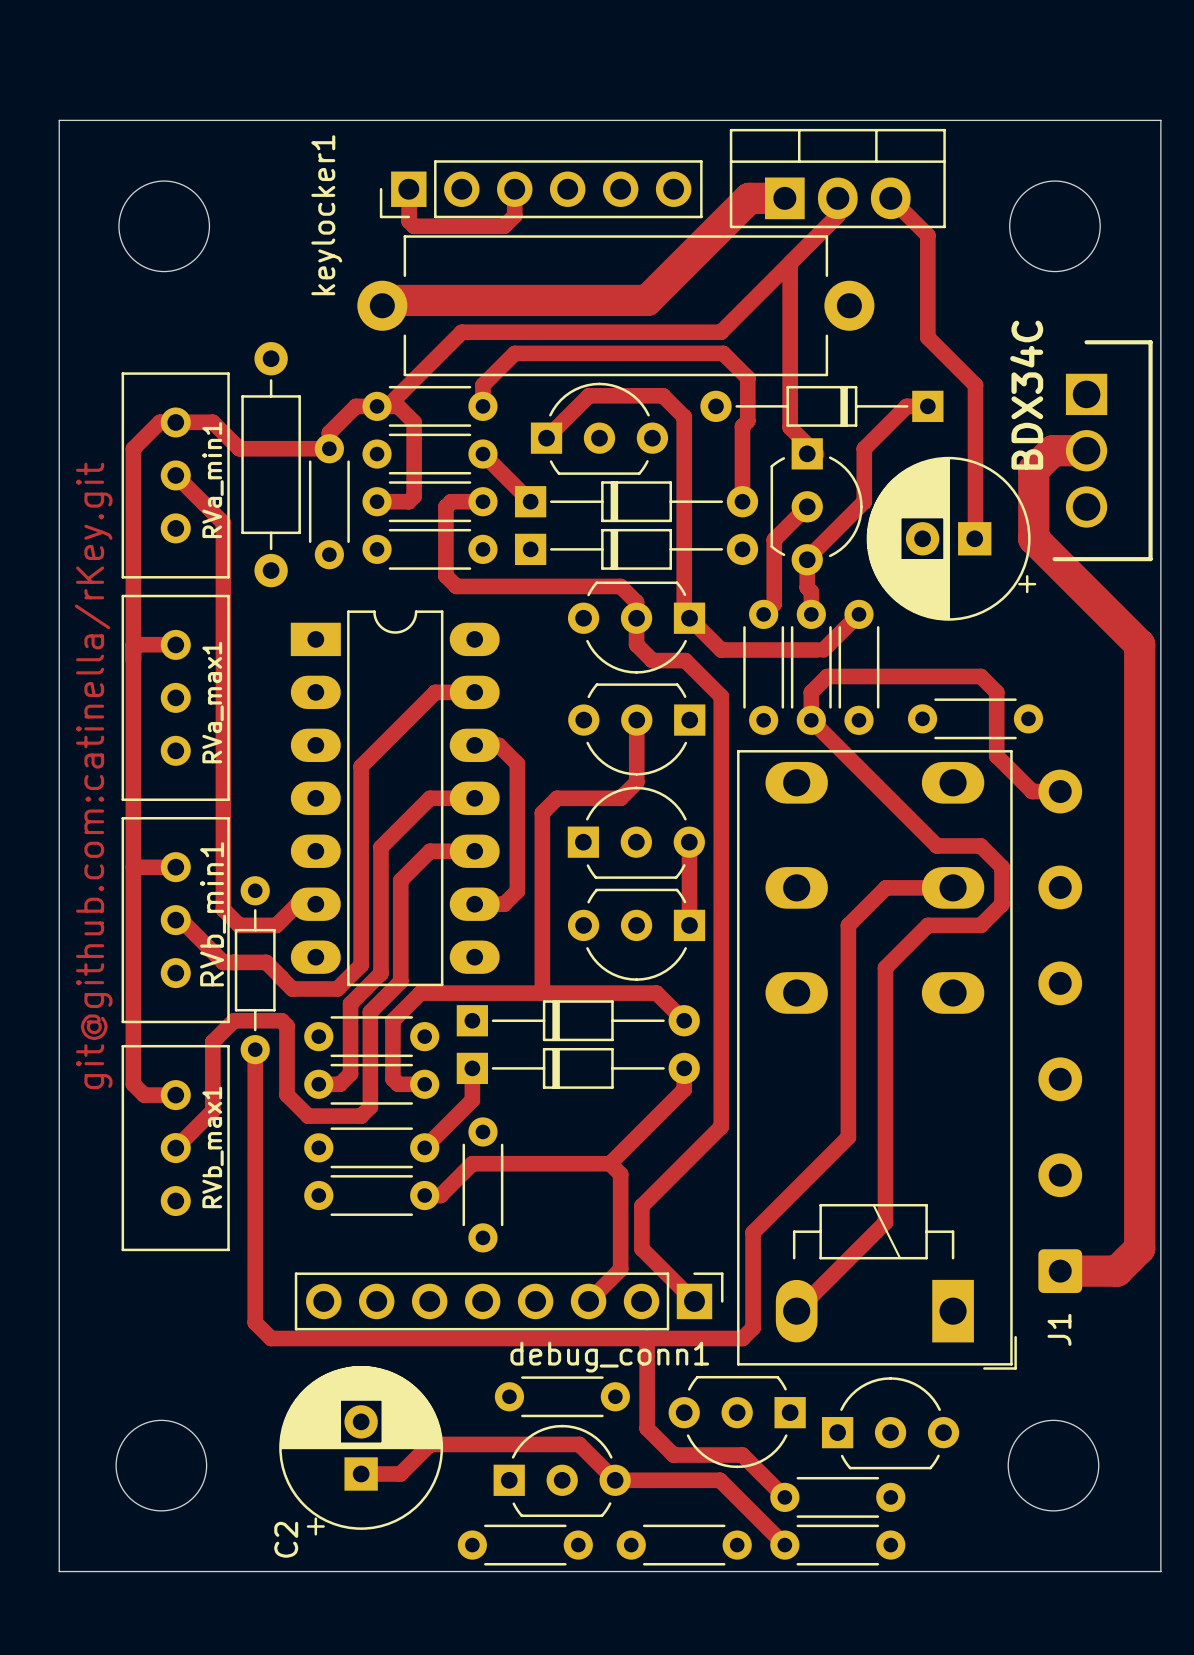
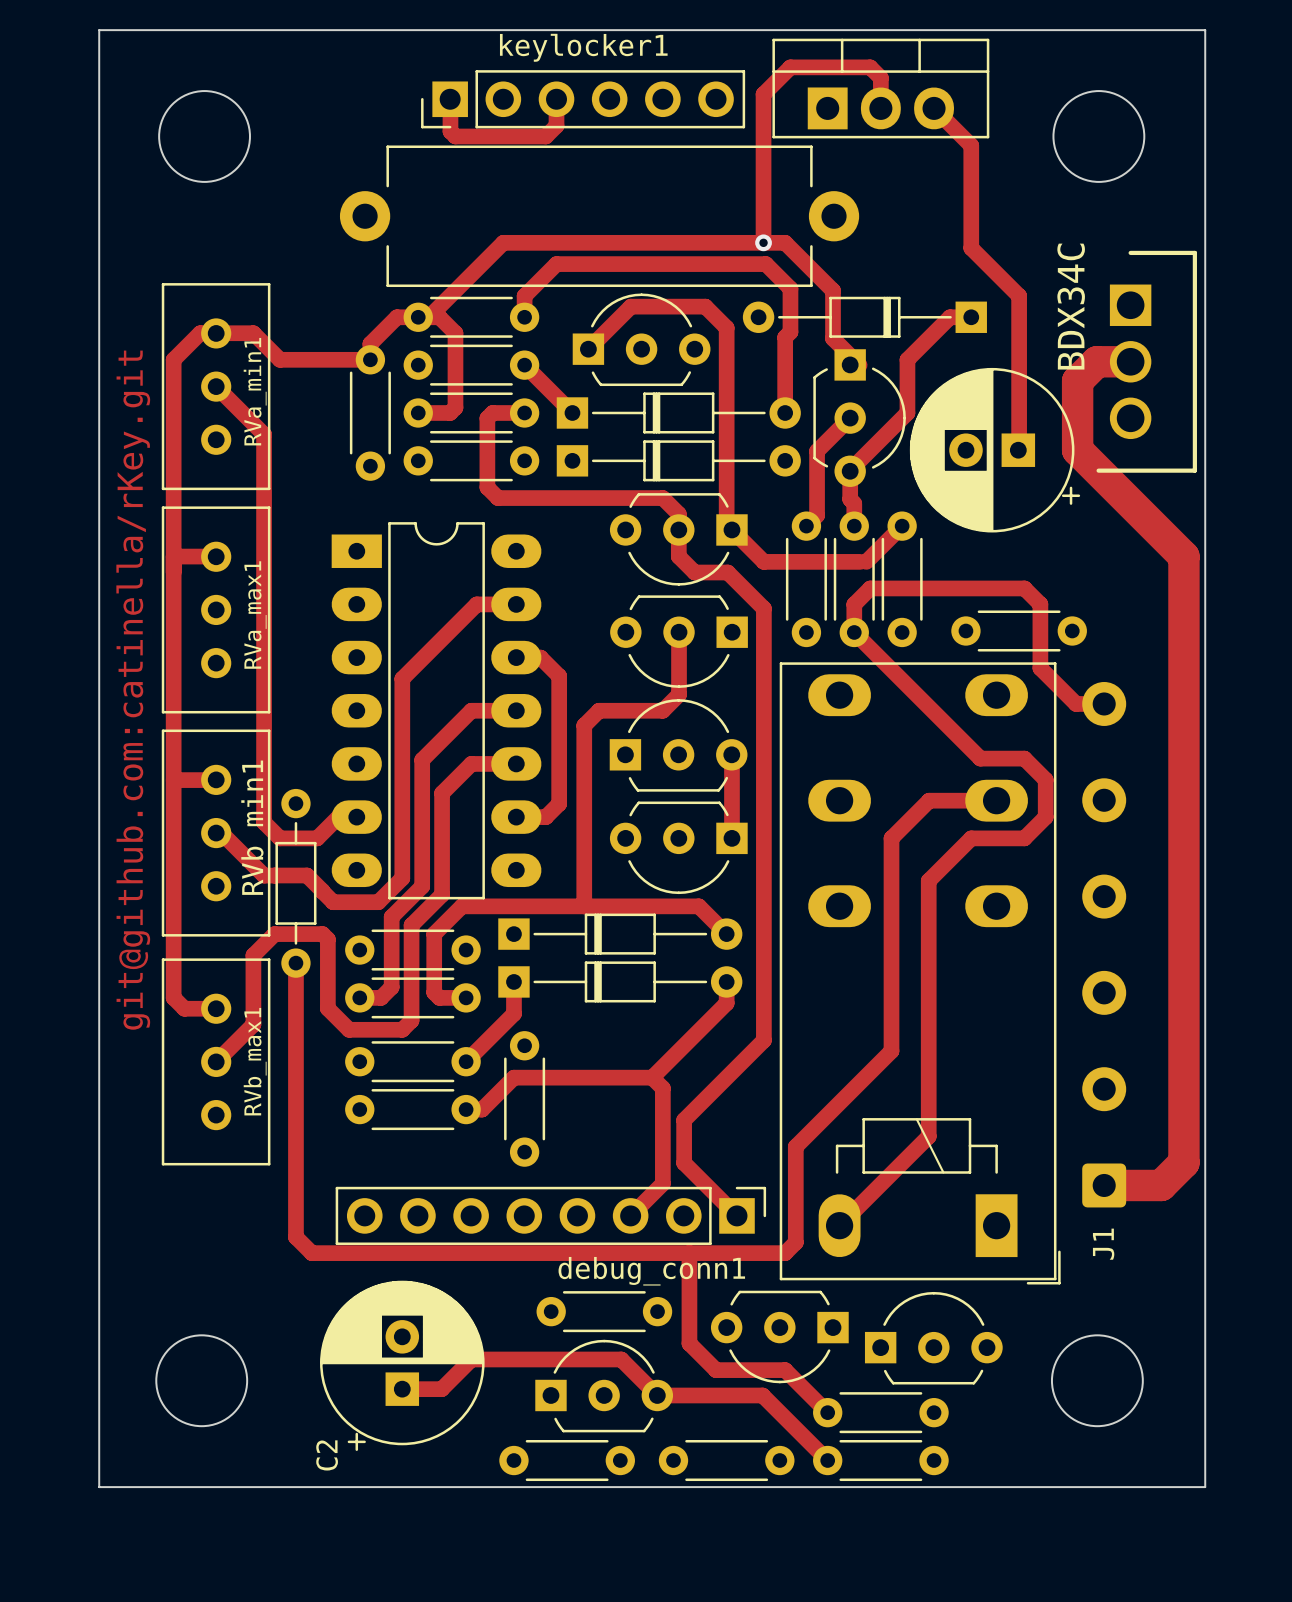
track: (784, 198) (749, 198) (647, 300) (387, 300) (382, 305) -> none
track: (837, 198) (837, 215) (790, 263) (790, 379) -> (880, 108) (880, 77) (870, 67) (790, 67) (763, 94) (763, 242) (785, 242) (833, 290)
keylocker1 name rotation: 0° (326, 215) -> 90° clockwise (583, 47)
keylocker1 name position: keylocker1 (326, 215) -> keylocker1 (583, 47)
track: (837, 215) (720, 332) -> none
part position: (615, 305) -> (599, 216)
via: none -> (763, 242)
part: (271, 464) -> none

